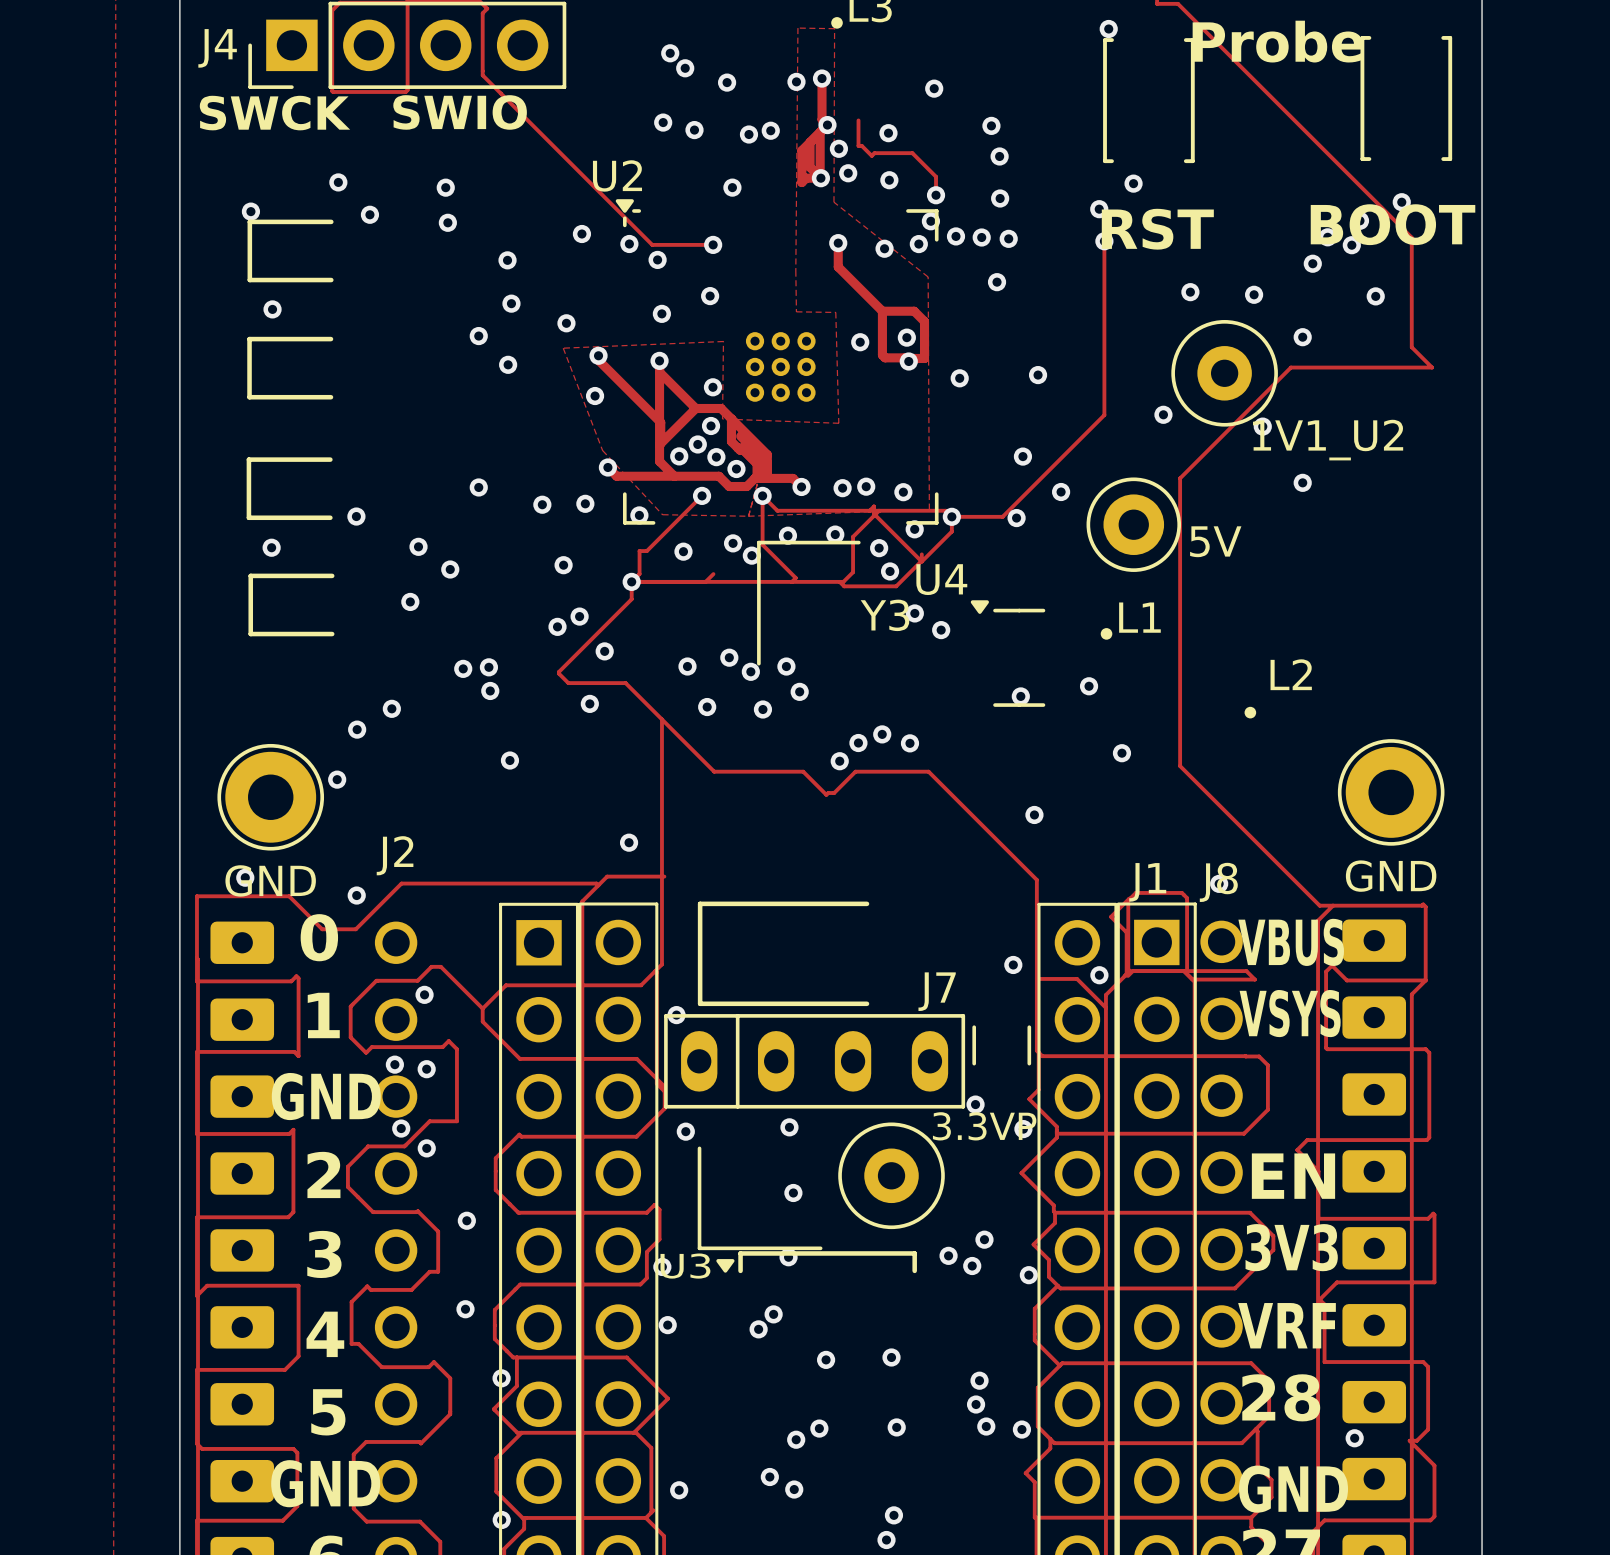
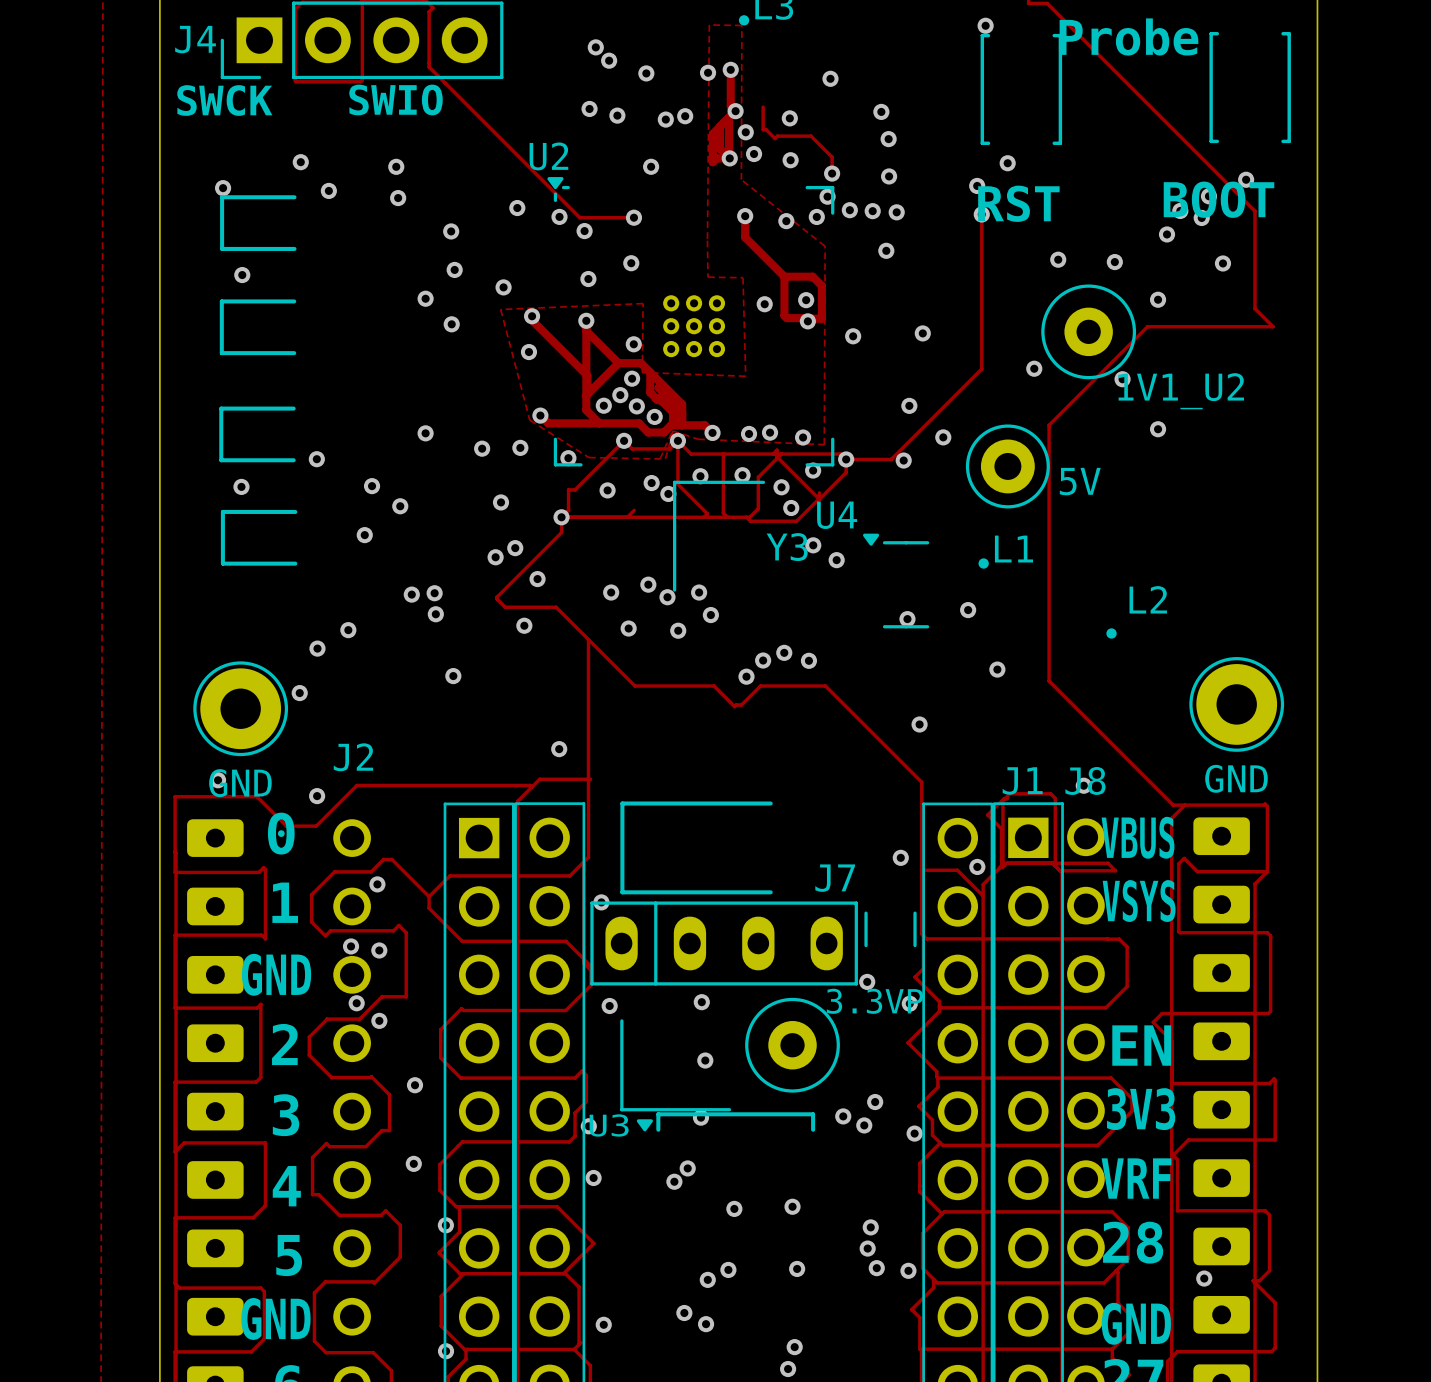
zone outline: (928, 277) (929, 509) (748, 516) (662, 514) (602, 450) (563, 348) -> (825, 246) (824, 444) (698, 439) (672, 430) (660, 458) (589, 457) (529, 420) (500, 309)
track: none -> (624, 440) (632, 448) (669, 448) (677, 440)
track: none -> (723, 454) (723, 512) (727, 517)

